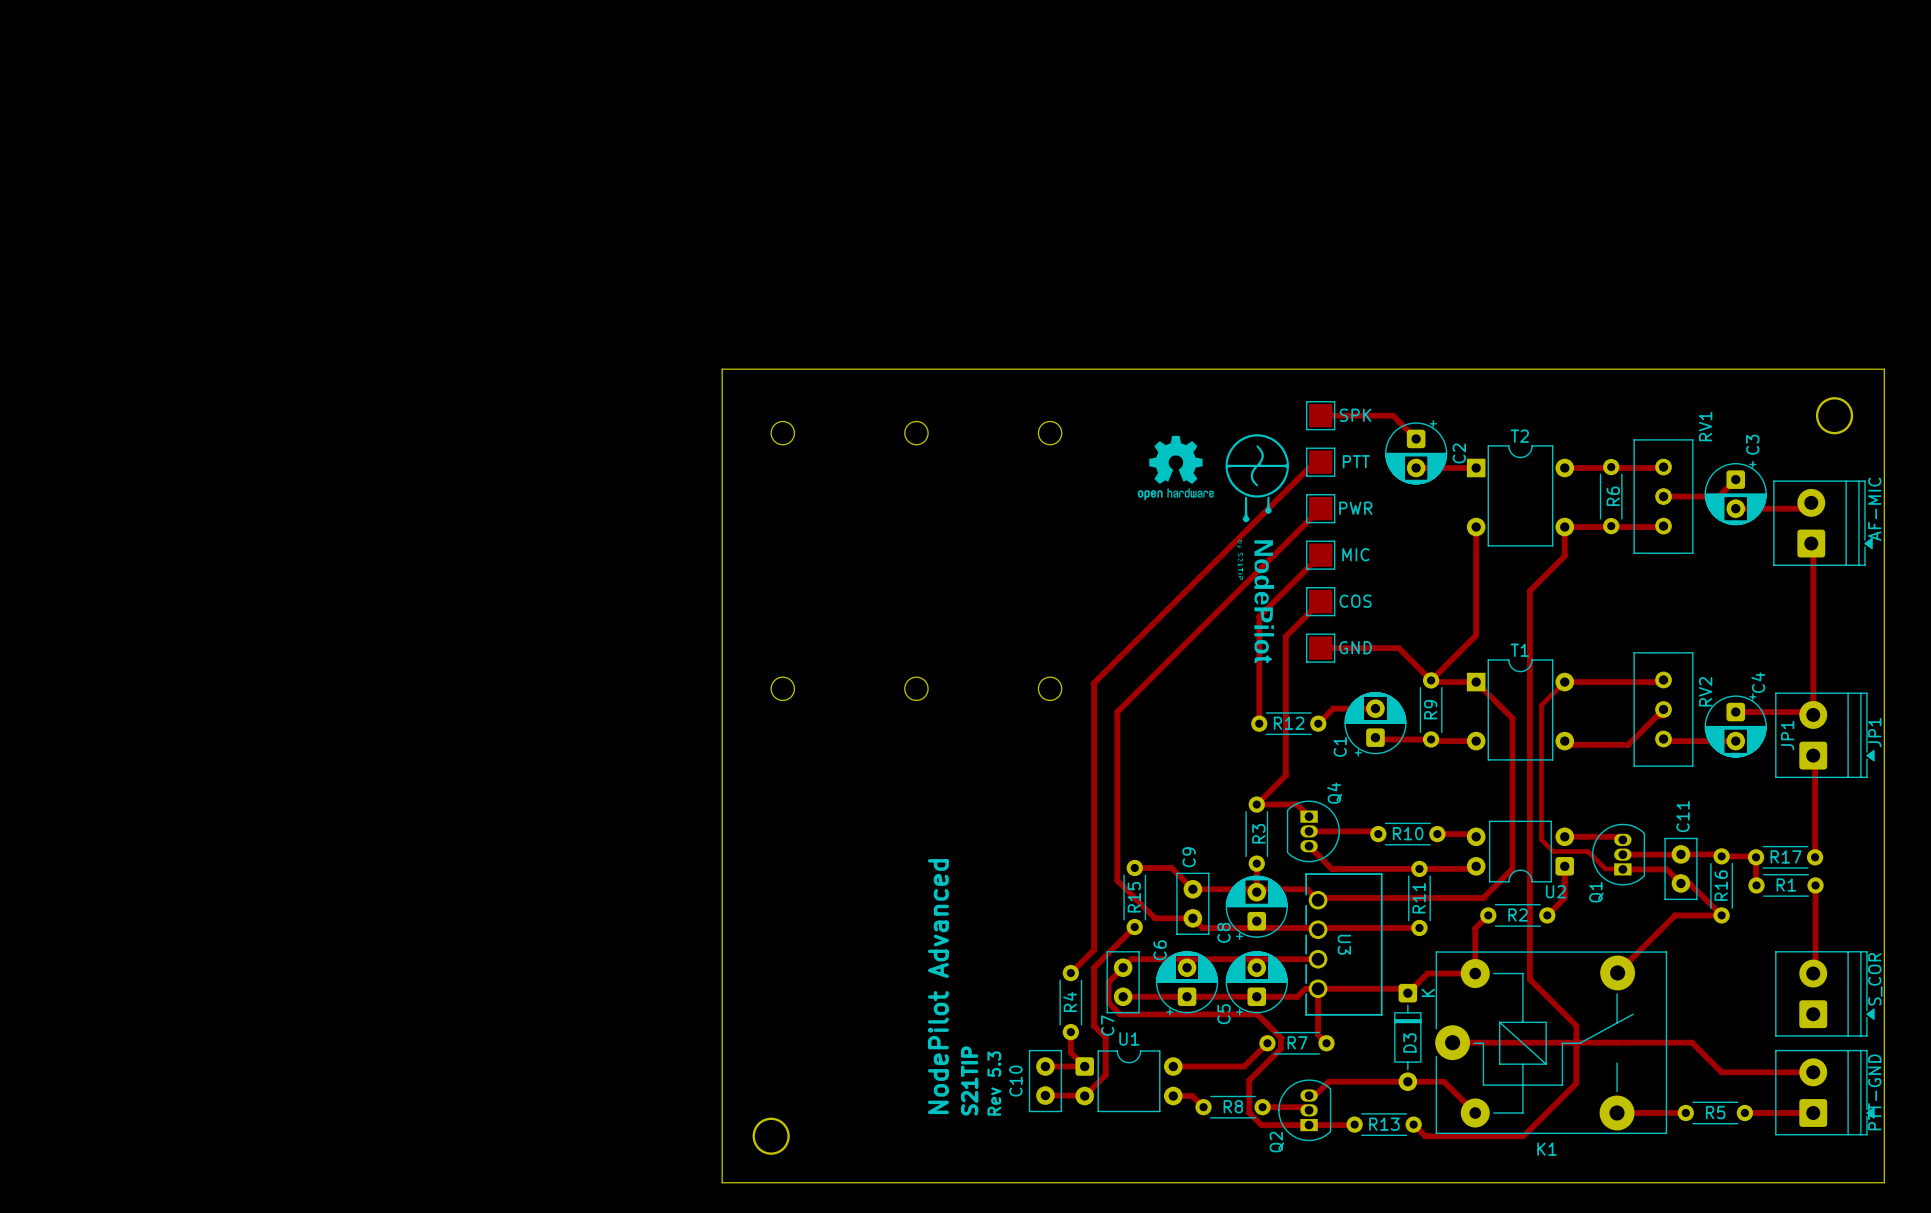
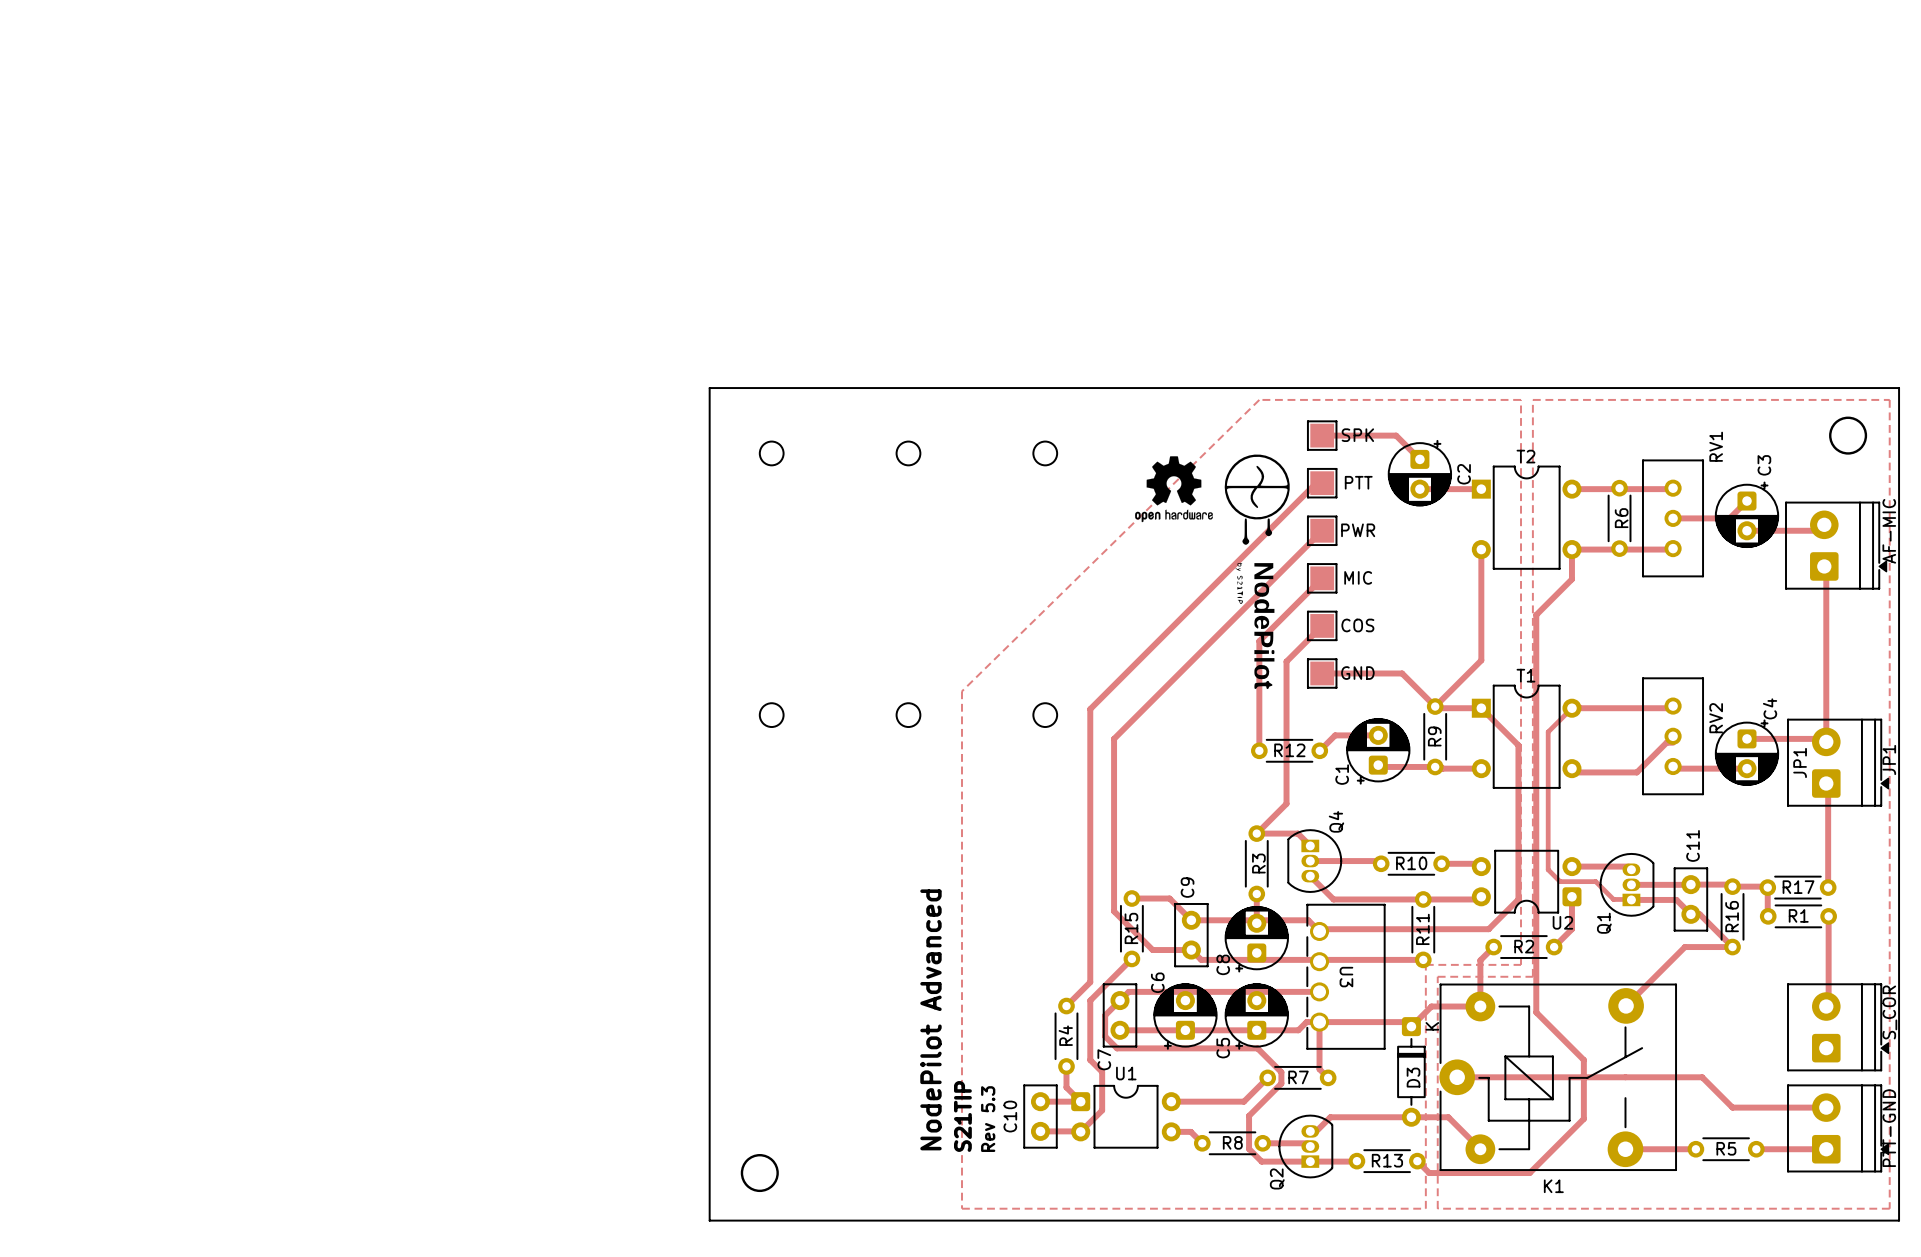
zone outline: none -> (1259, 399) (1521, 399) (1521, 964) (1425, 964) (1425, 1208) (961, 1208) (961, 691) (1259, 399)
zone outline: none -> (1532, 399) (1532, 976) (1437, 976) (1437, 1208) (1889, 1208) (1889, 399) (1532, 399)

